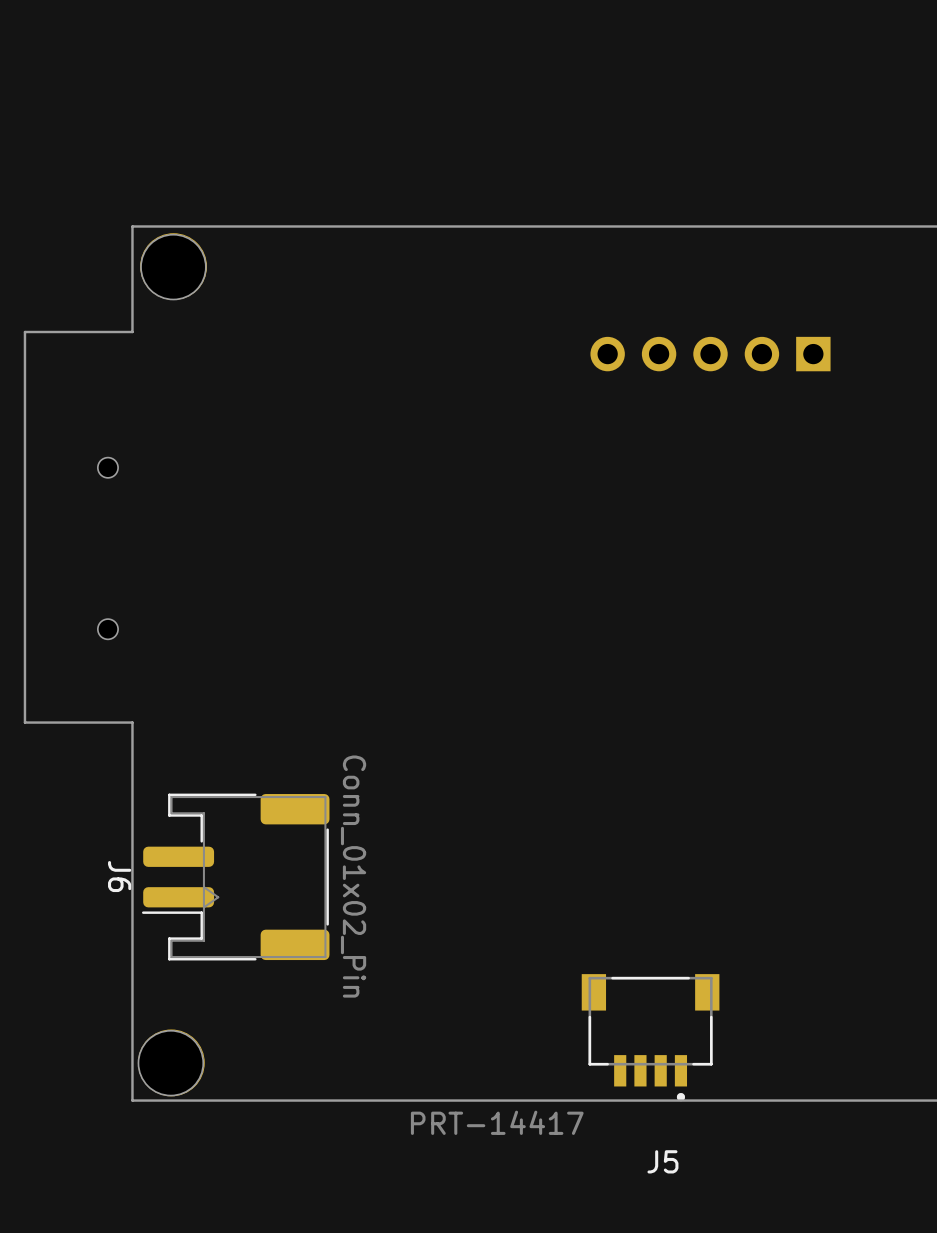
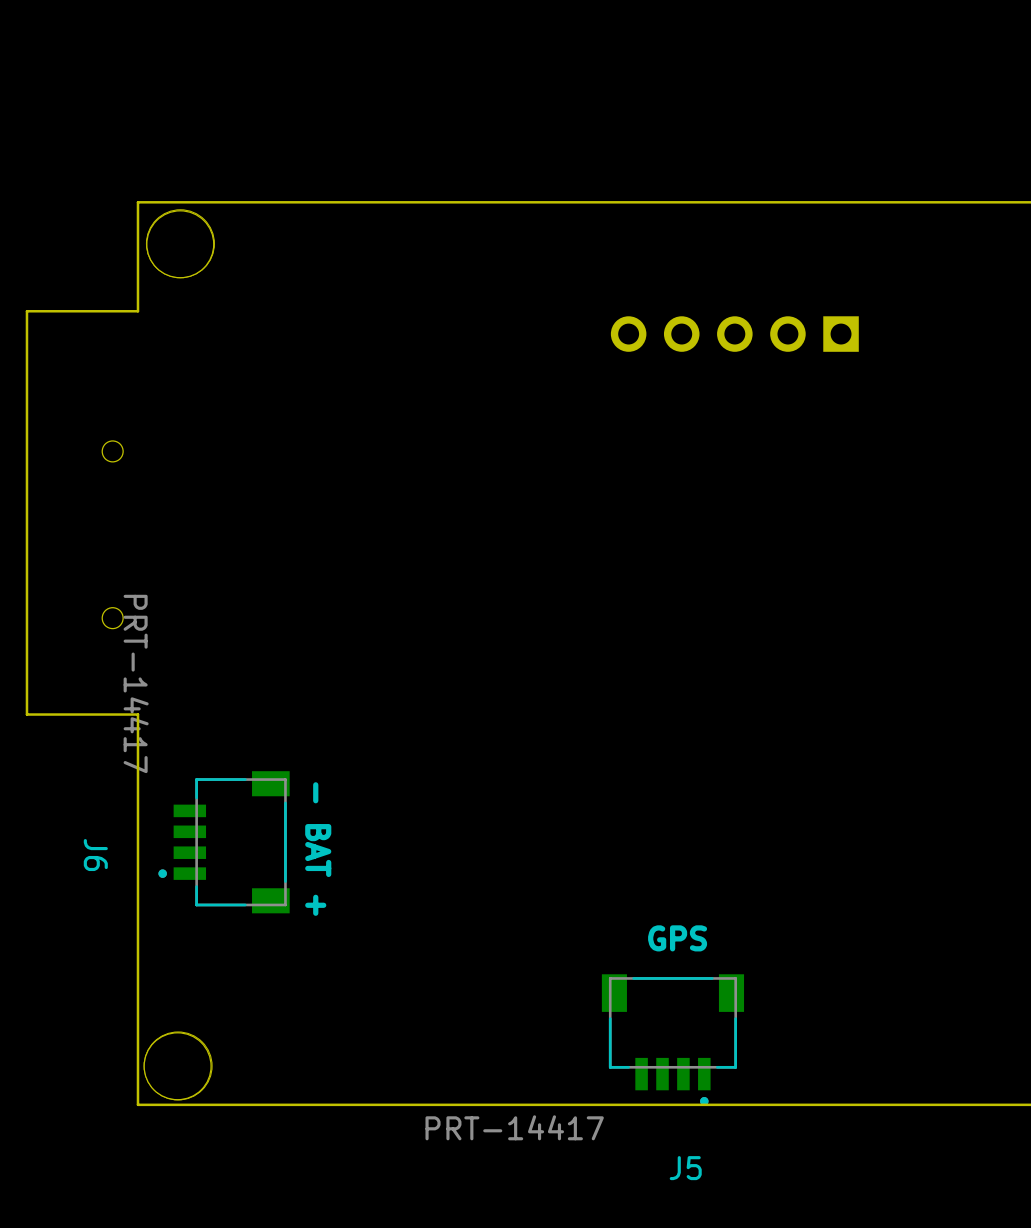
J6 footprint: [141, 793, 330, 961] -> [158, 771, 290, 914]
text: none -> - BAT + (318, 849)
J6 value: Conn_01x02_Pin (353, 876) -> PRT-14417 (136, 683)
text: none -> GPS (677, 938)

